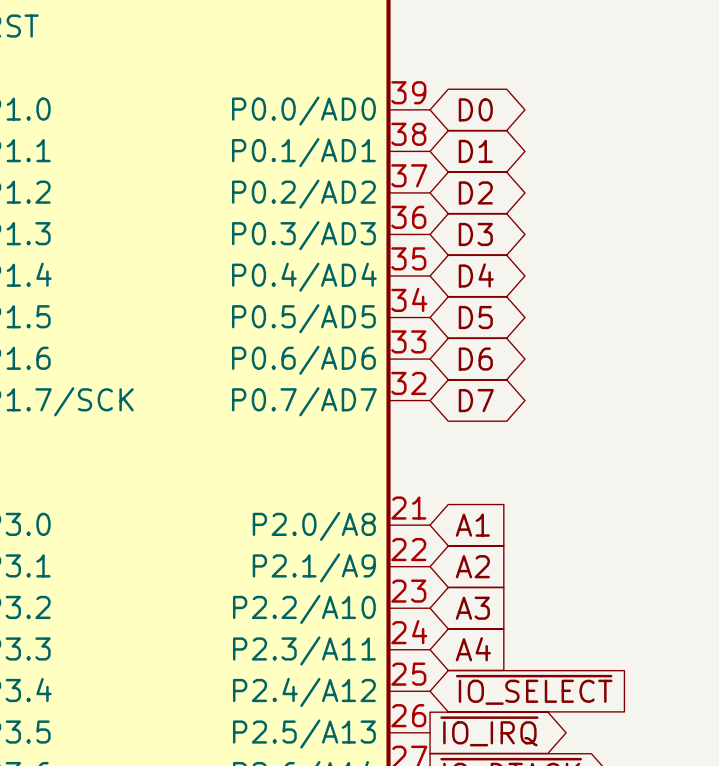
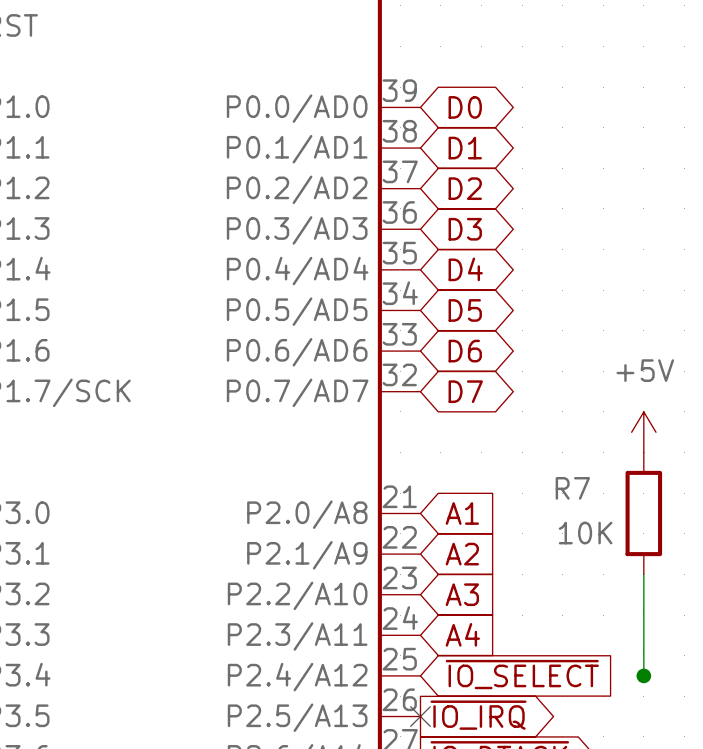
power symbol: none -> +5V (643, 432)
R7: none -> 10K (643, 513)
wire: none -> (643, 574) (643, 675)
junction: none -> (643, 675)
no-connect mark: none -> (420, 716)

